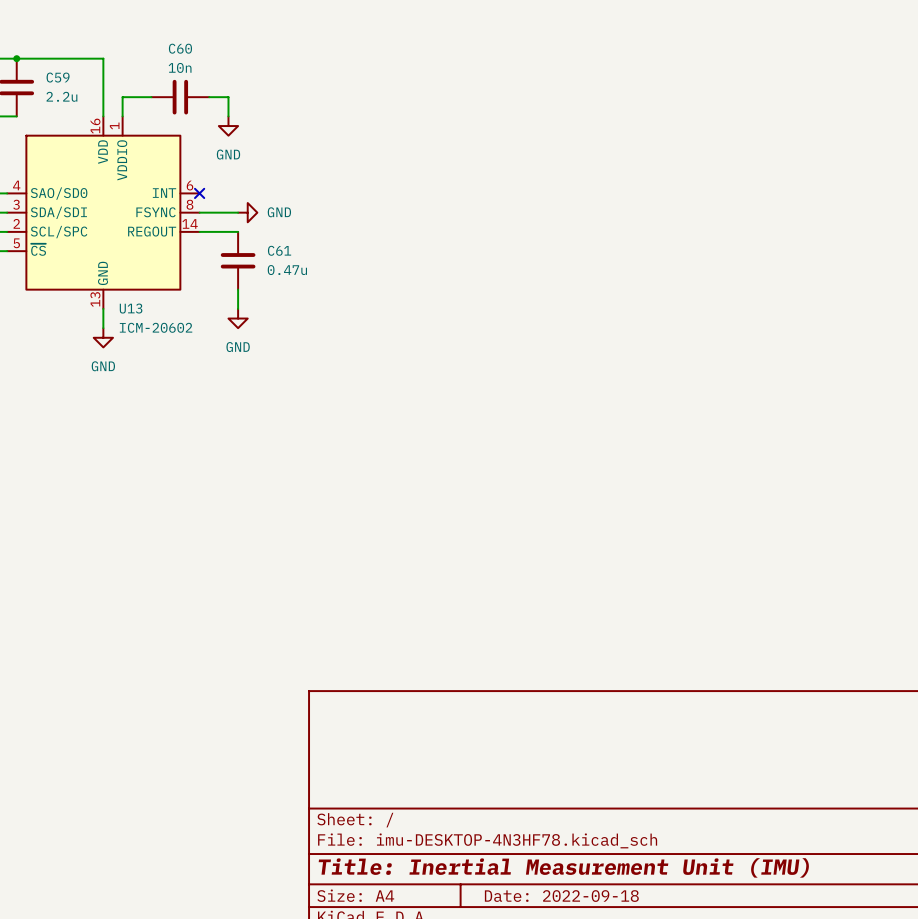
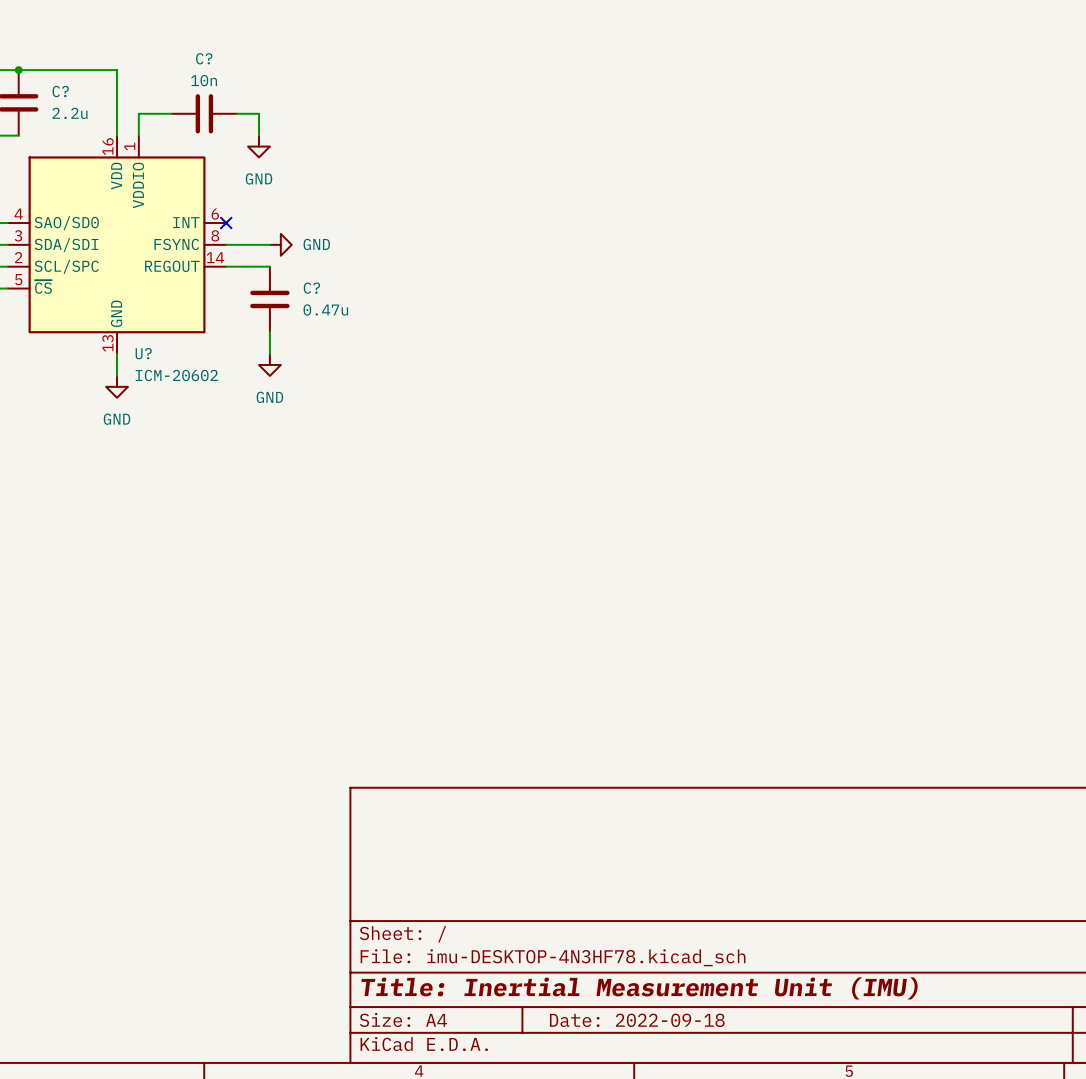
C60 name: C60 (180, 48) -> C? (204, 58)
C59 name: C59 (58, 77) -> C? (60, 91)
C61 name: C61 (279, 250) -> C? (311, 288)
U13 name: U13 (131, 308) -> U? (143, 353)

